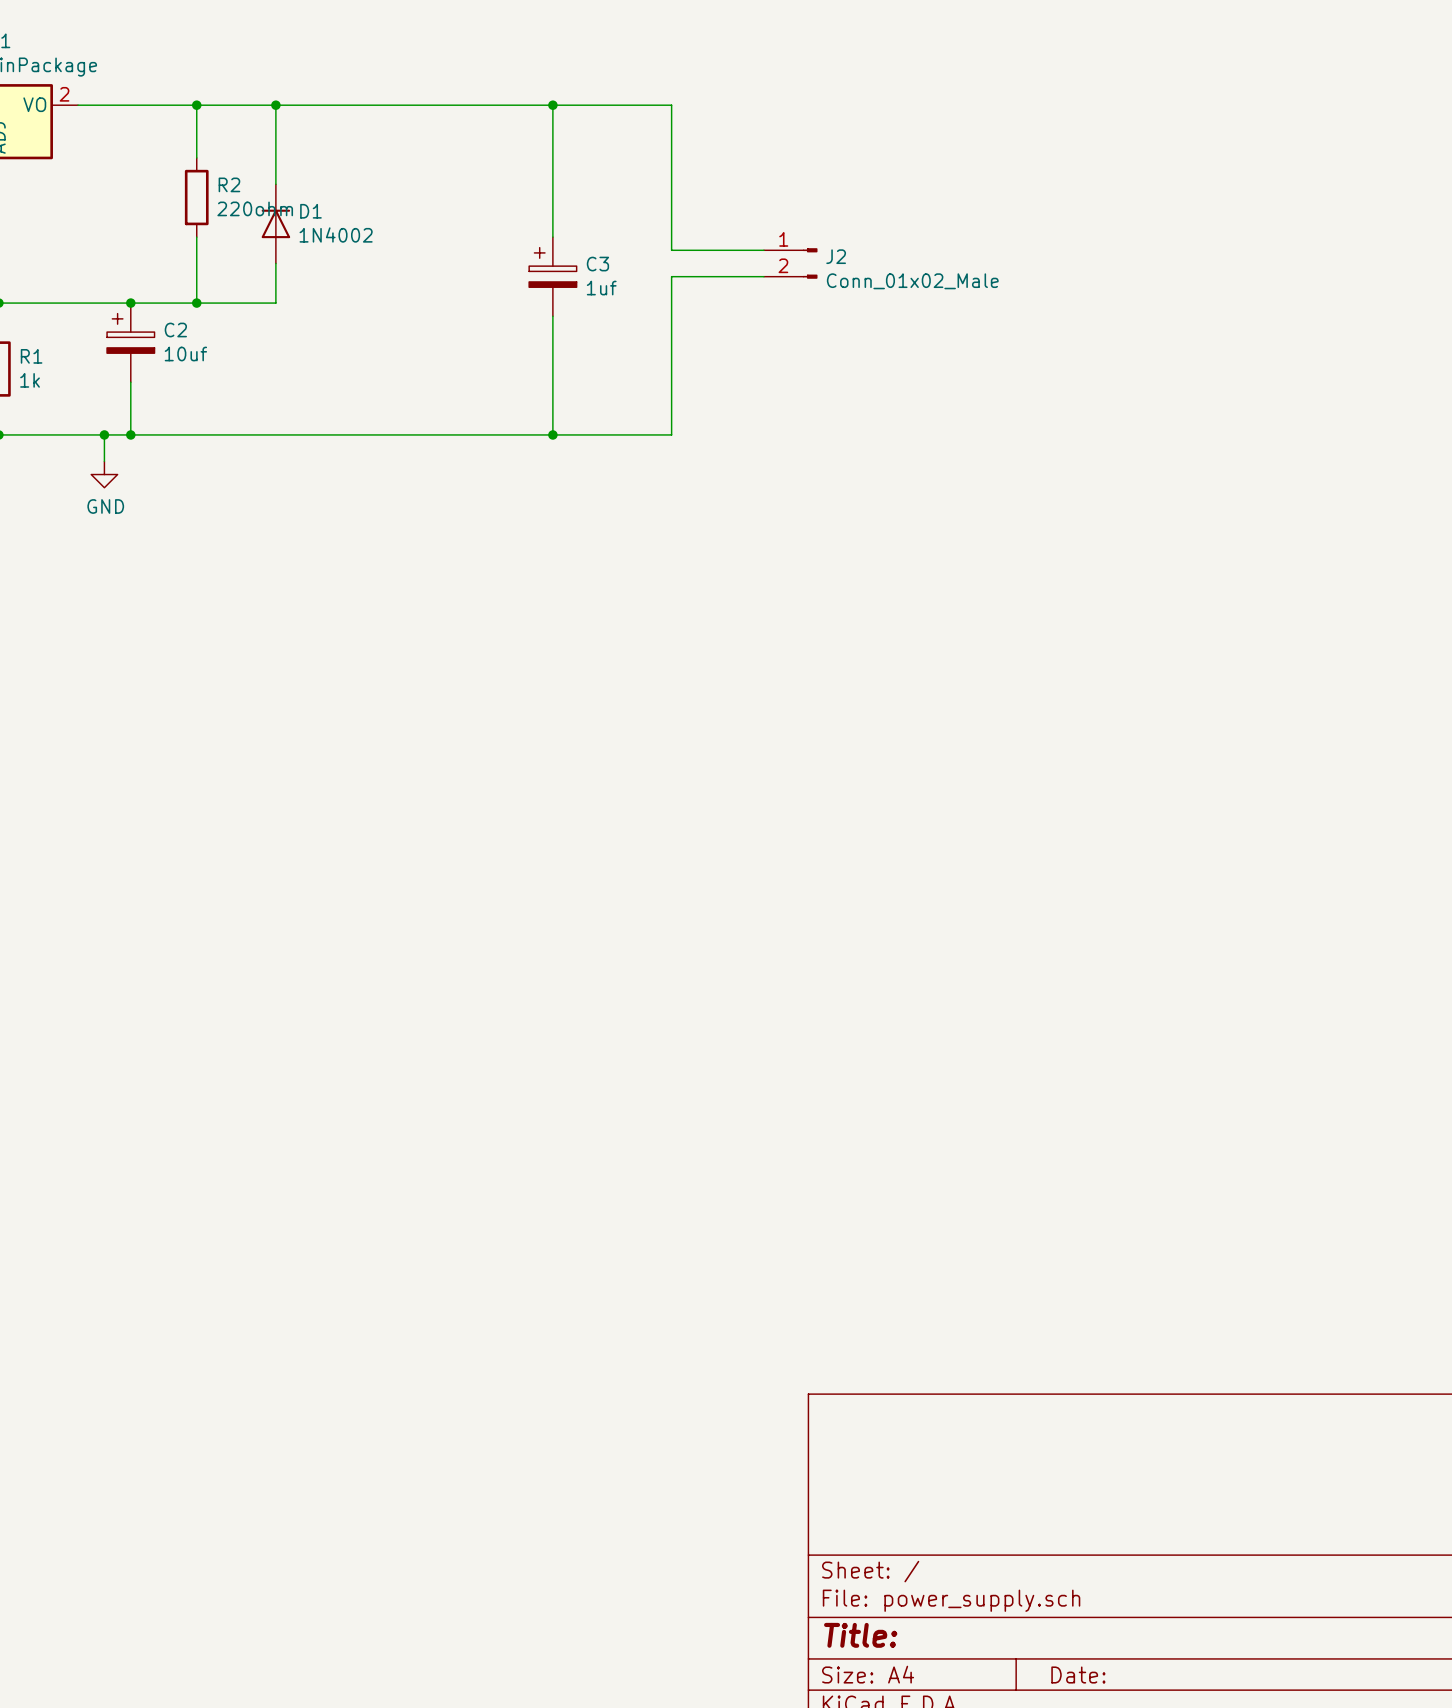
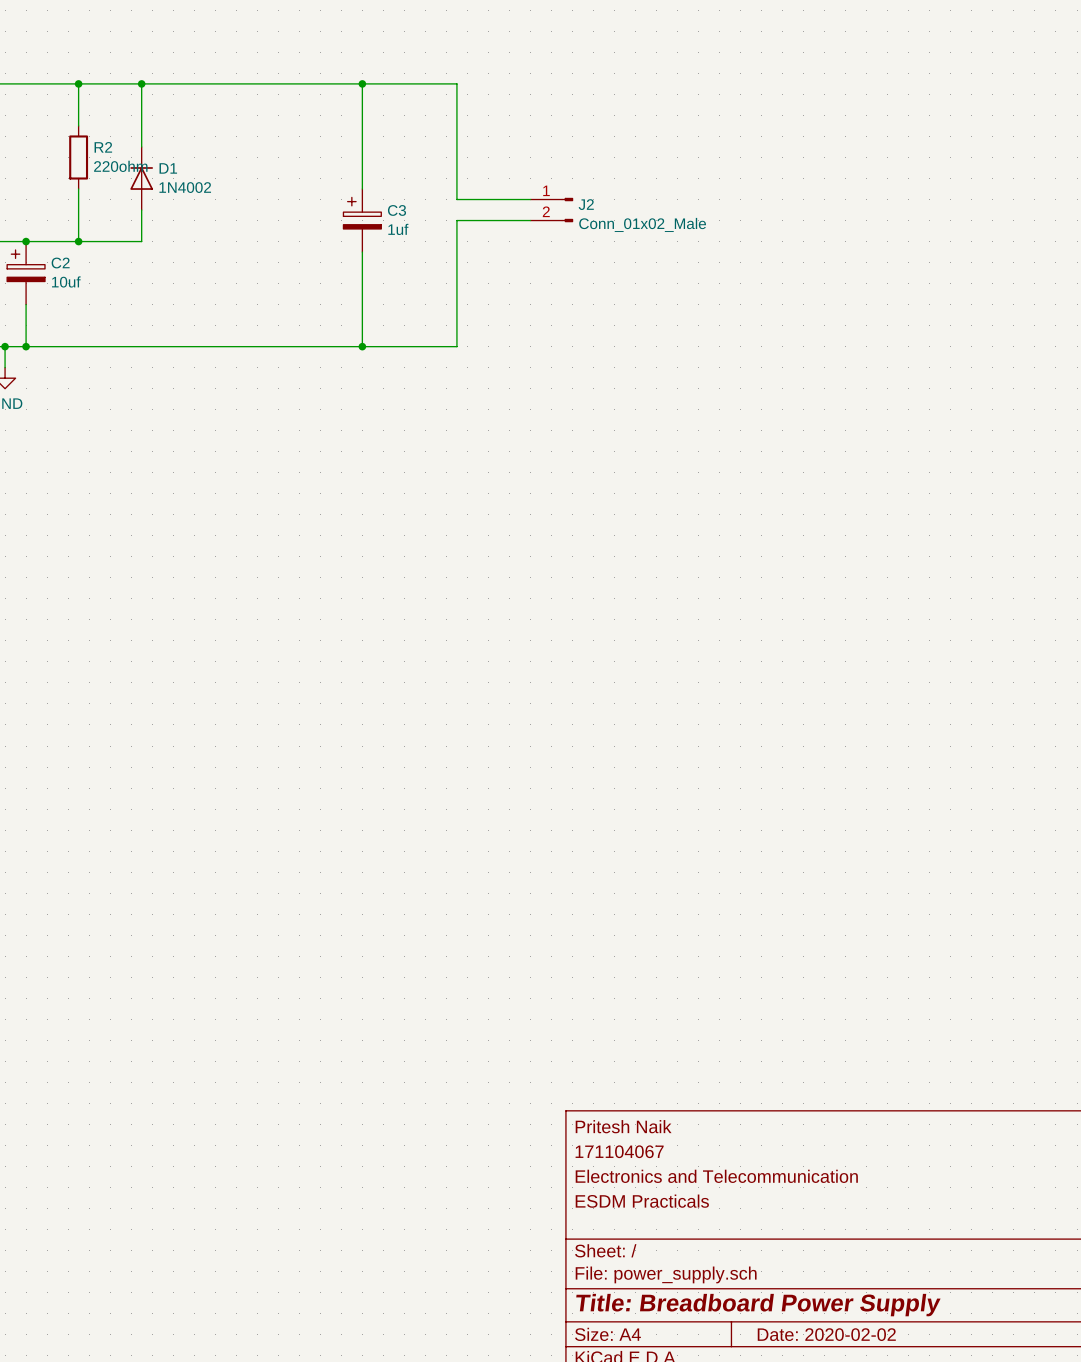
title block: none -> Pritesh Naik (623, 1126)
title block: none -> 171104067 (619, 1151)
title block: none -> Electronics and Telecommunication (716, 1176)
title block: none -> ESDM Practicals (642, 1201)
title block: Title: (860, 1635) -> Title: Breadboard Power Supply (758, 1305)
title block: Date: (1078, 1675) -> Date: 2020-02-02 (826, 1334)

